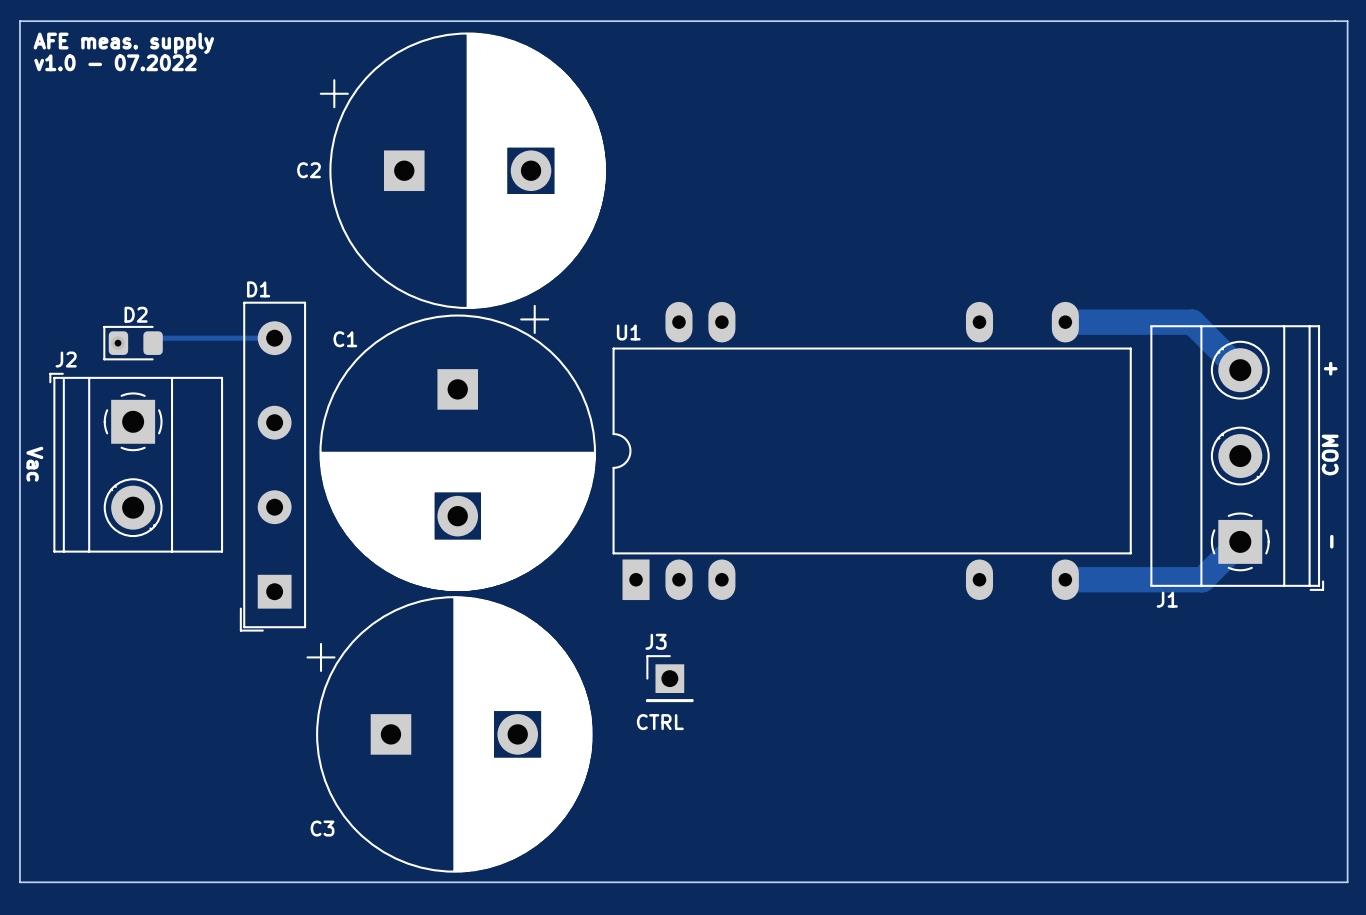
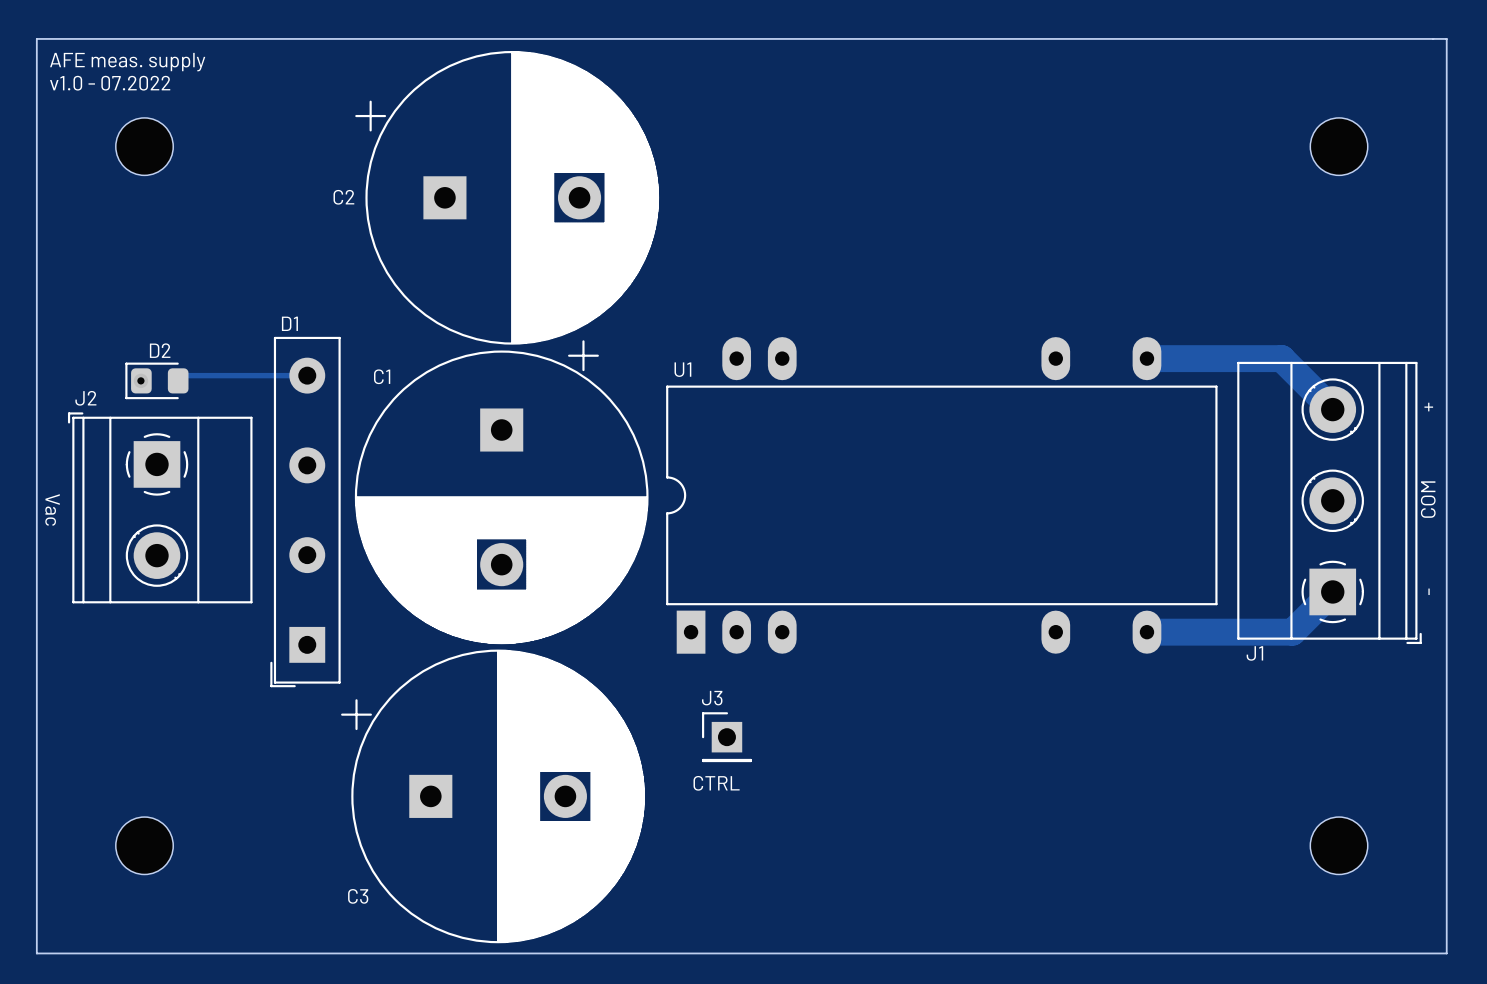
part: none -> (144, 146)
part: none -> (1339, 146)
part: none -> (144, 845)
part: none -> (1339, 845)

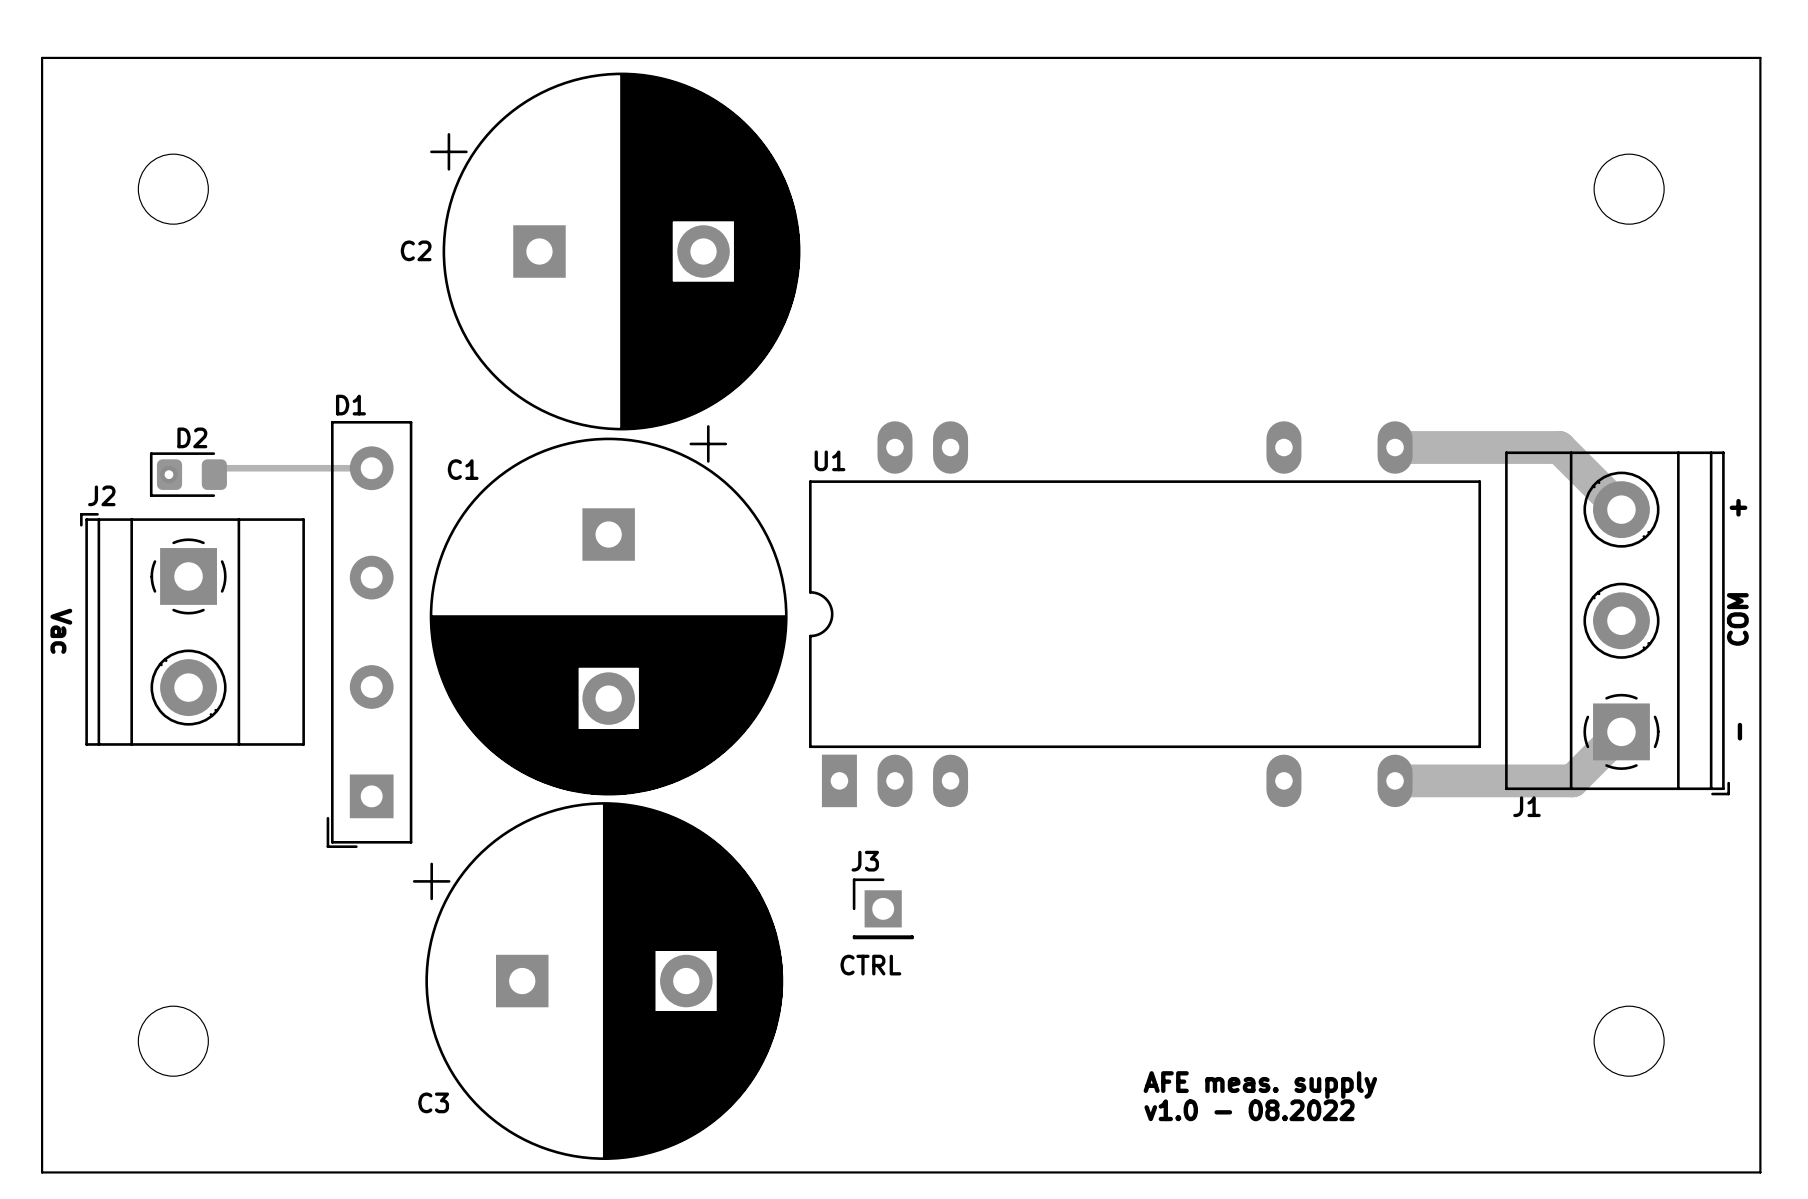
text: AFE meas. supply (127, 62) -> none
text: v1.0 - 07.2022 (110, 83) -> none
text: none -> AFE meas. supply (1260, 1084)
text: none -> v1.0 - 08.2022 (1249, 1110)

